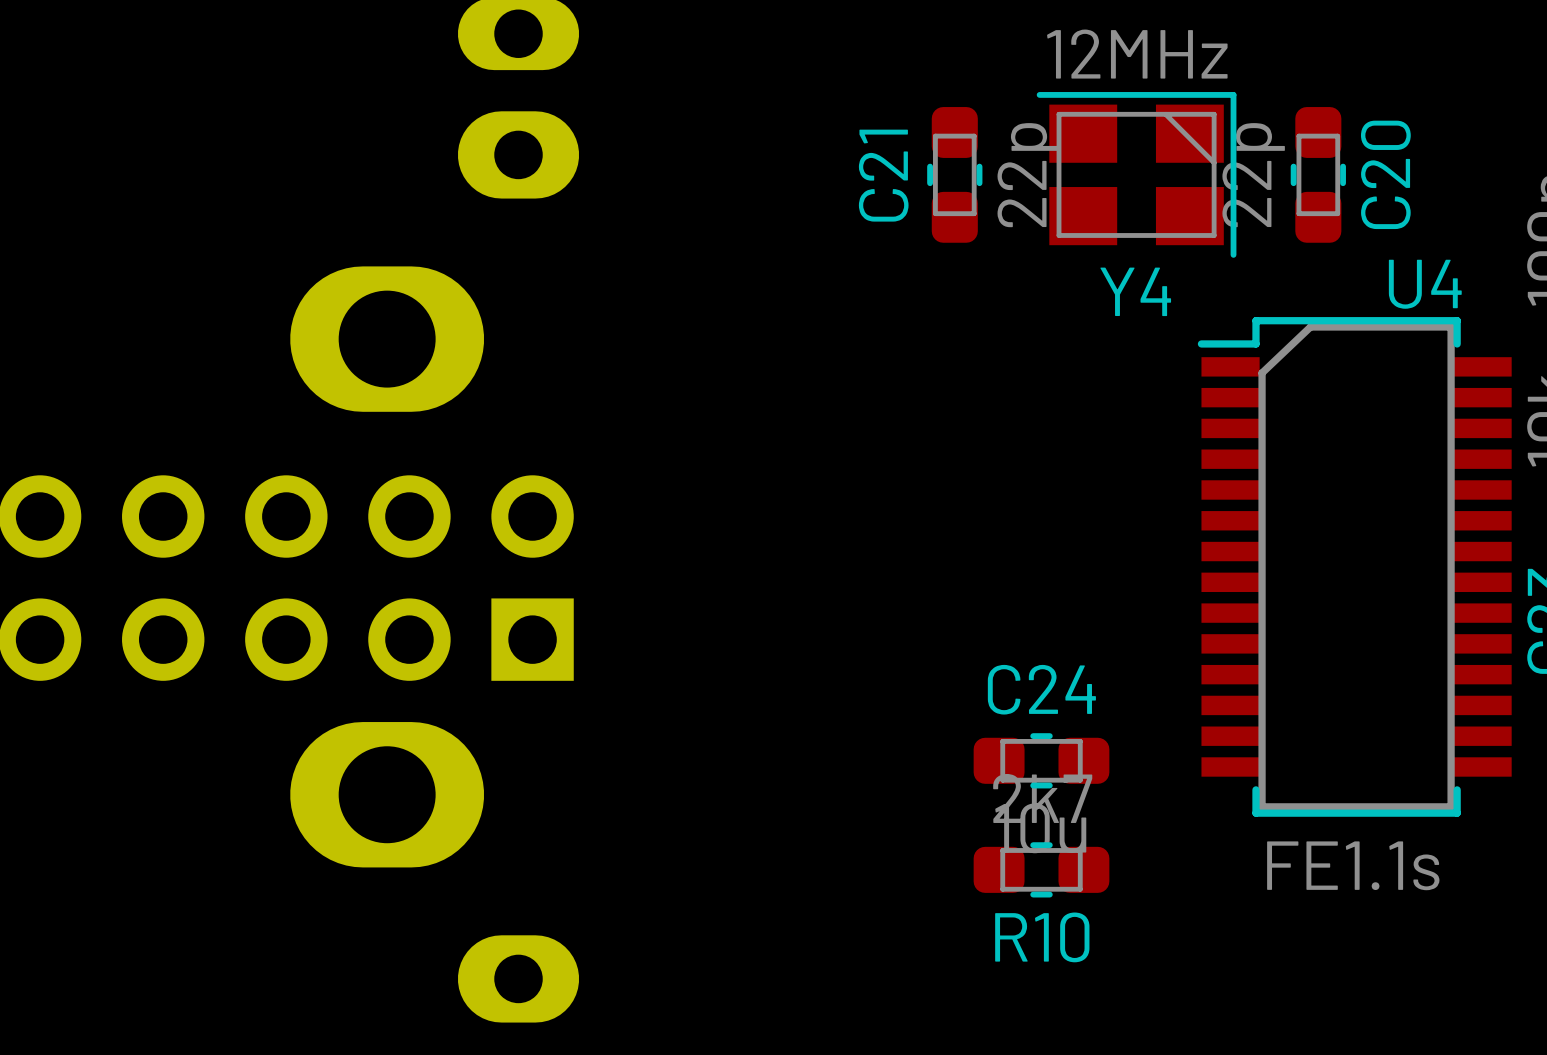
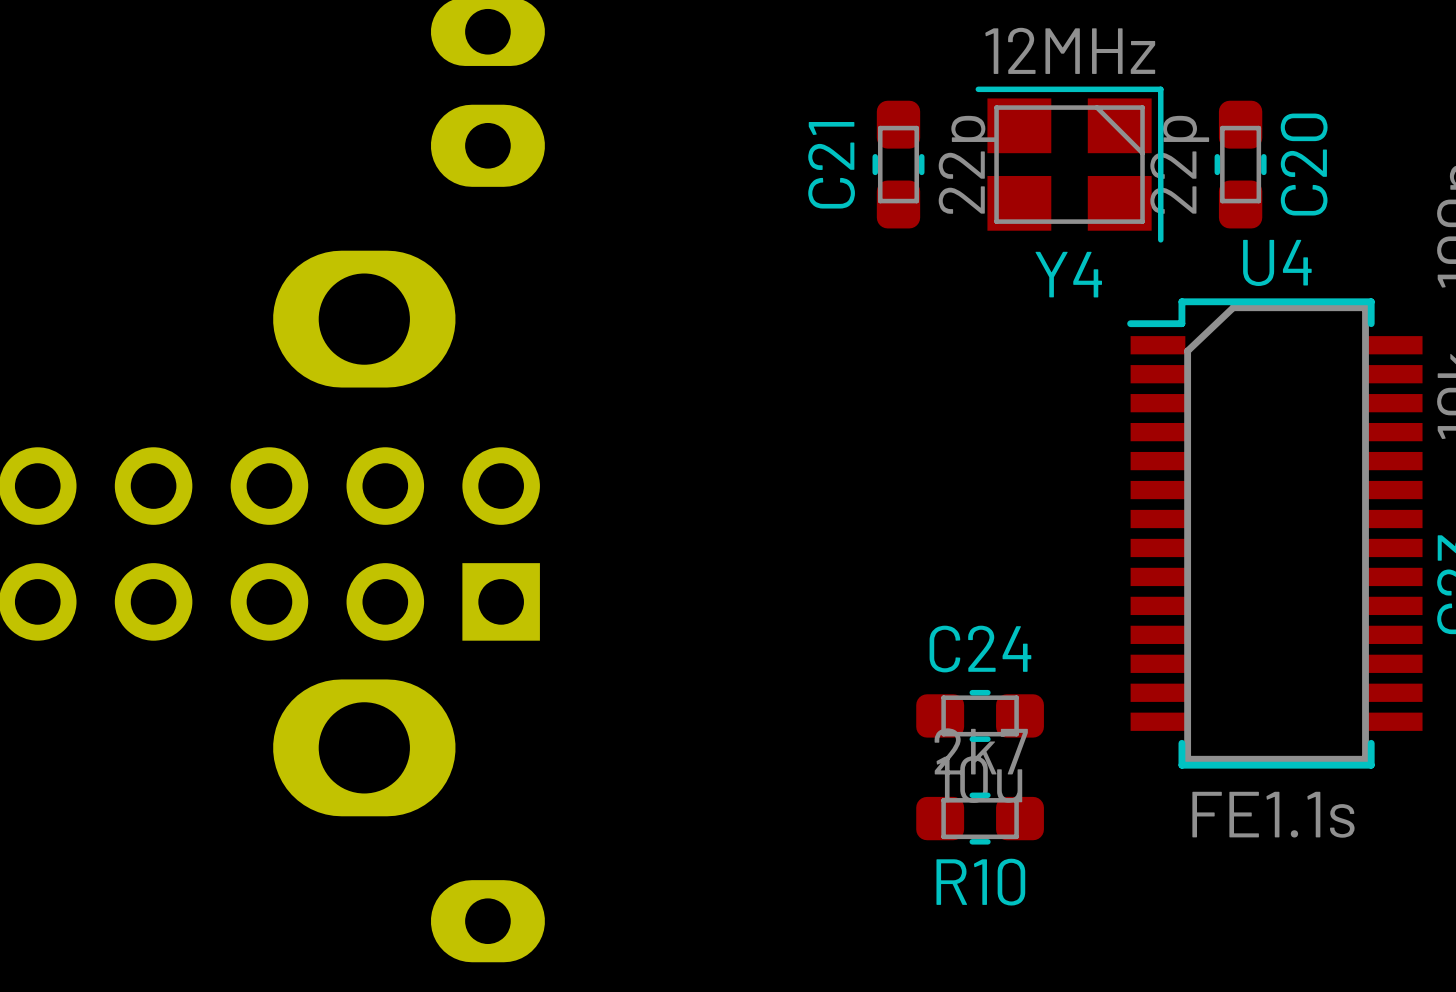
U4 name position: U4 (1425, 284) -> U4 (1277, 262)

